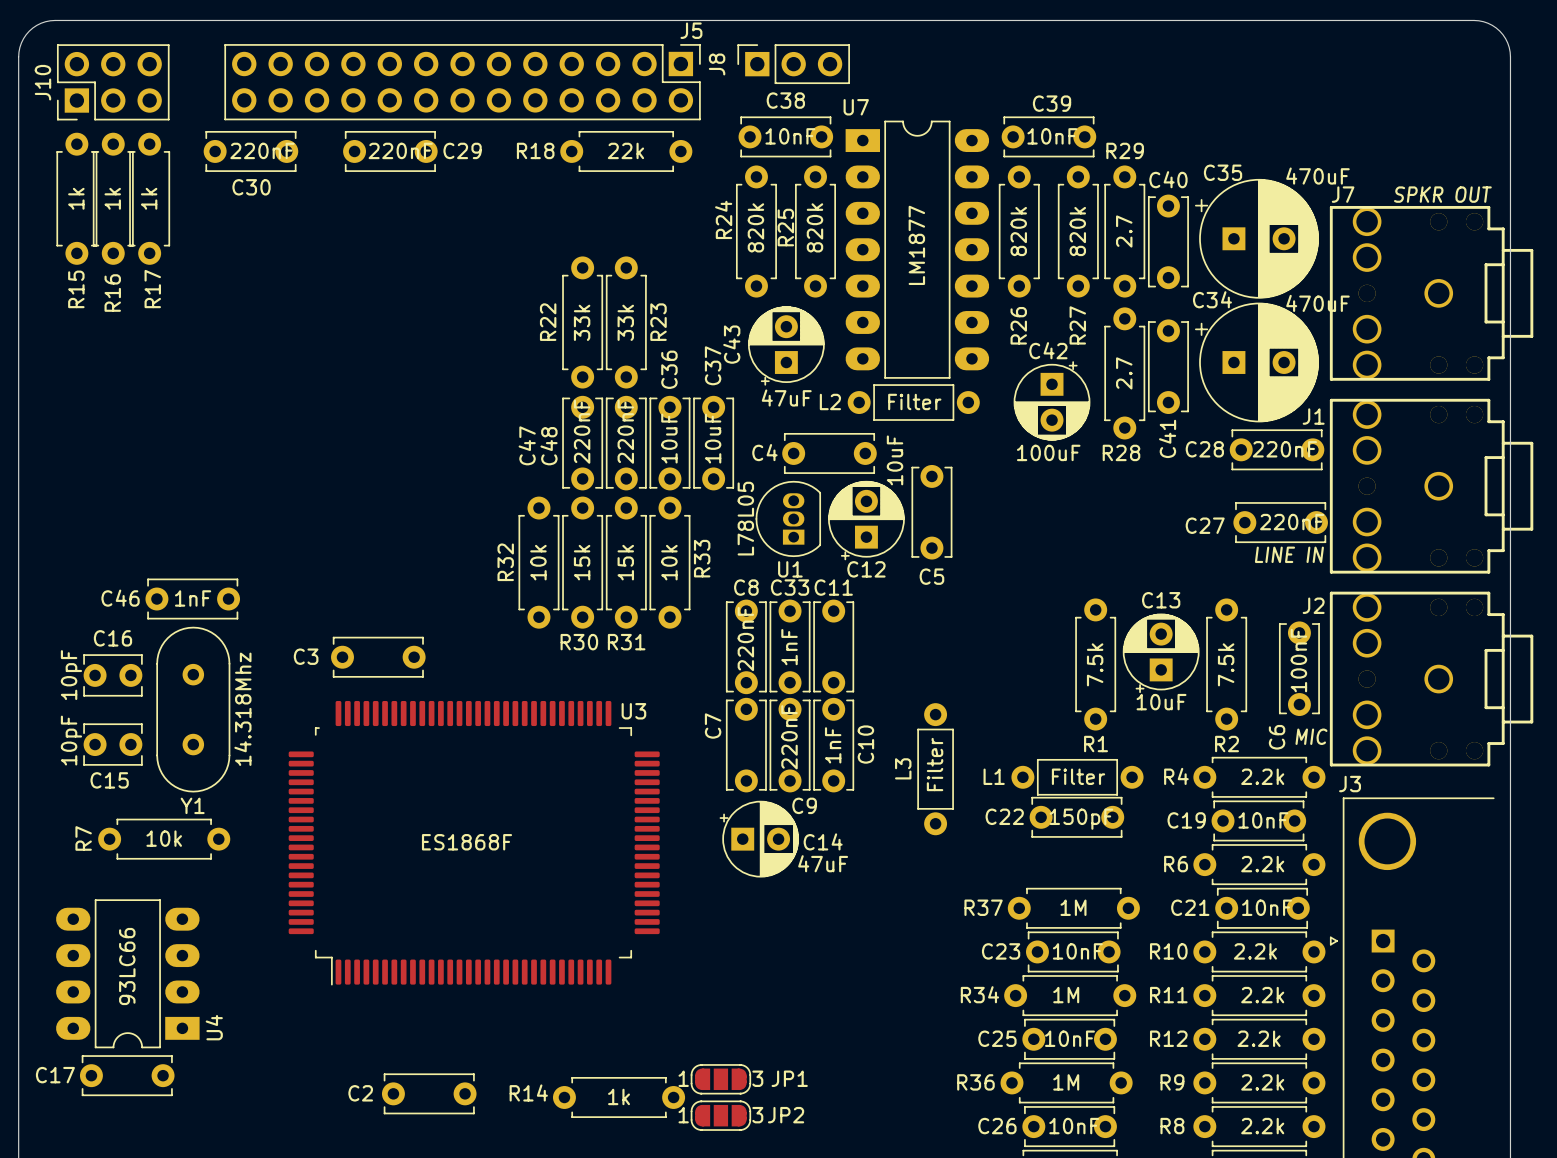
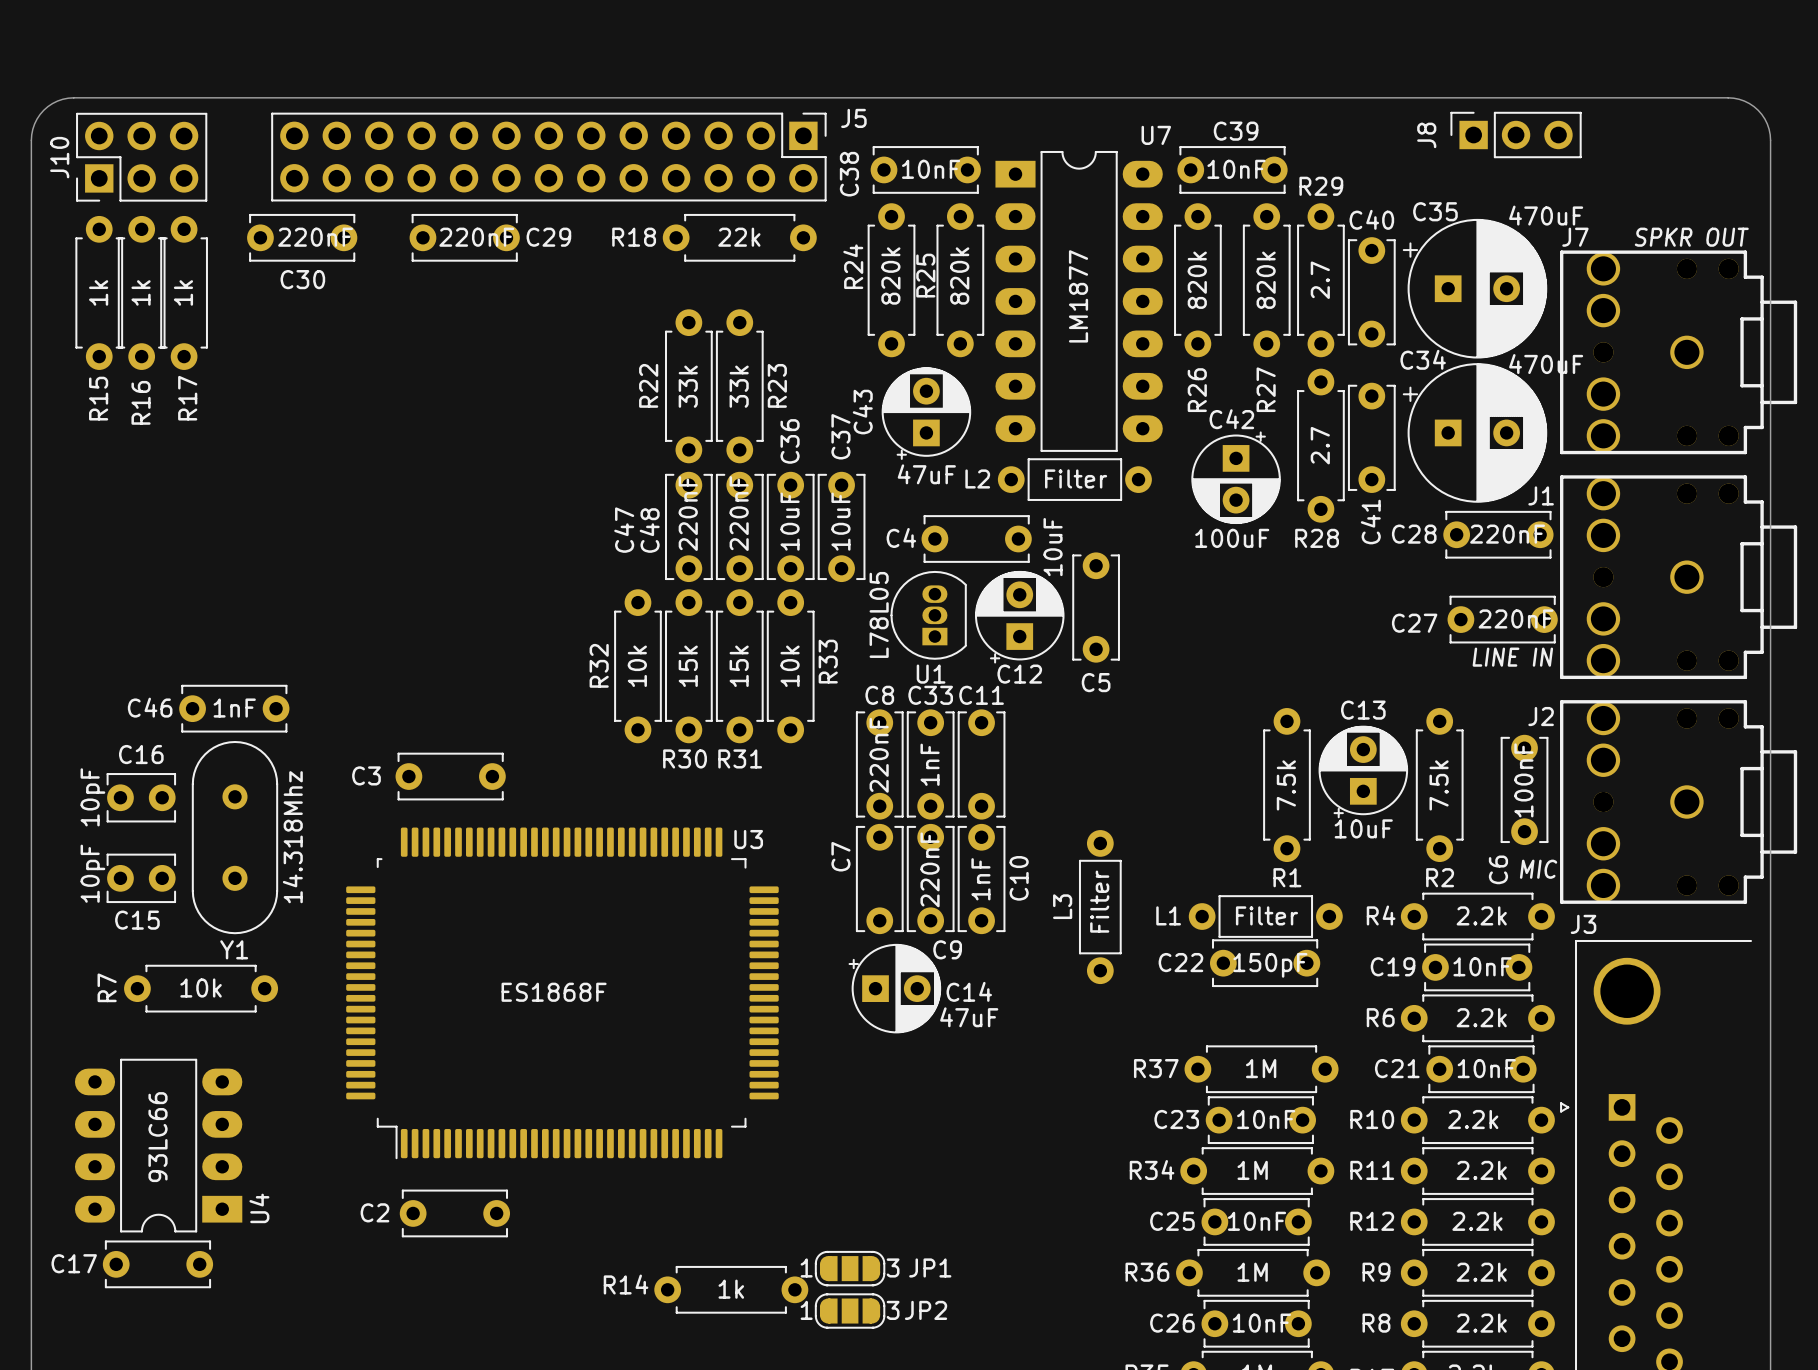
J5 name position: J5 (691, 30) -> J5 (853, 118)
J8 position: (793, 64) -> (1516, 135)
J10 position: (113, 82) -> (141, 157)
J5 position: (462, 82) -> (548, 157)
C38 name rotation: 0° (785, 100) -> 90° counterclockwise (849, 174)
C38 name position: C38 (785, 100) -> C38 (849, 174)
U7 name position: U7 (856, 107) -> U7 (1156, 135)
board edge: (18, 111) (18, 56) (21, 42) (32, 27) (45, 21) (55, 20) (1474, 20) (1488, 23) (1496, 27) (1507, 42) (1510, 56) (1510, 111) -> (31, 140) (34, 124) (43, 110) (57, 101) (73, 97) (1728, 97) (1744, 101) (1758, 110) (1767, 124) (1770, 140)
C30 position: (250, 151) -> (302, 237)
C29 position: (390, 151) -> (464, 237)
R18 position: (626, 151) -> (739, 237)
R15 position: (76, 198) -> (99, 292)
R16 position: (113, 198) -> (141, 292)
R17 position: (149, 198) -> (184, 292)
C2 position: (429, 1093) -> (454, 1213)

